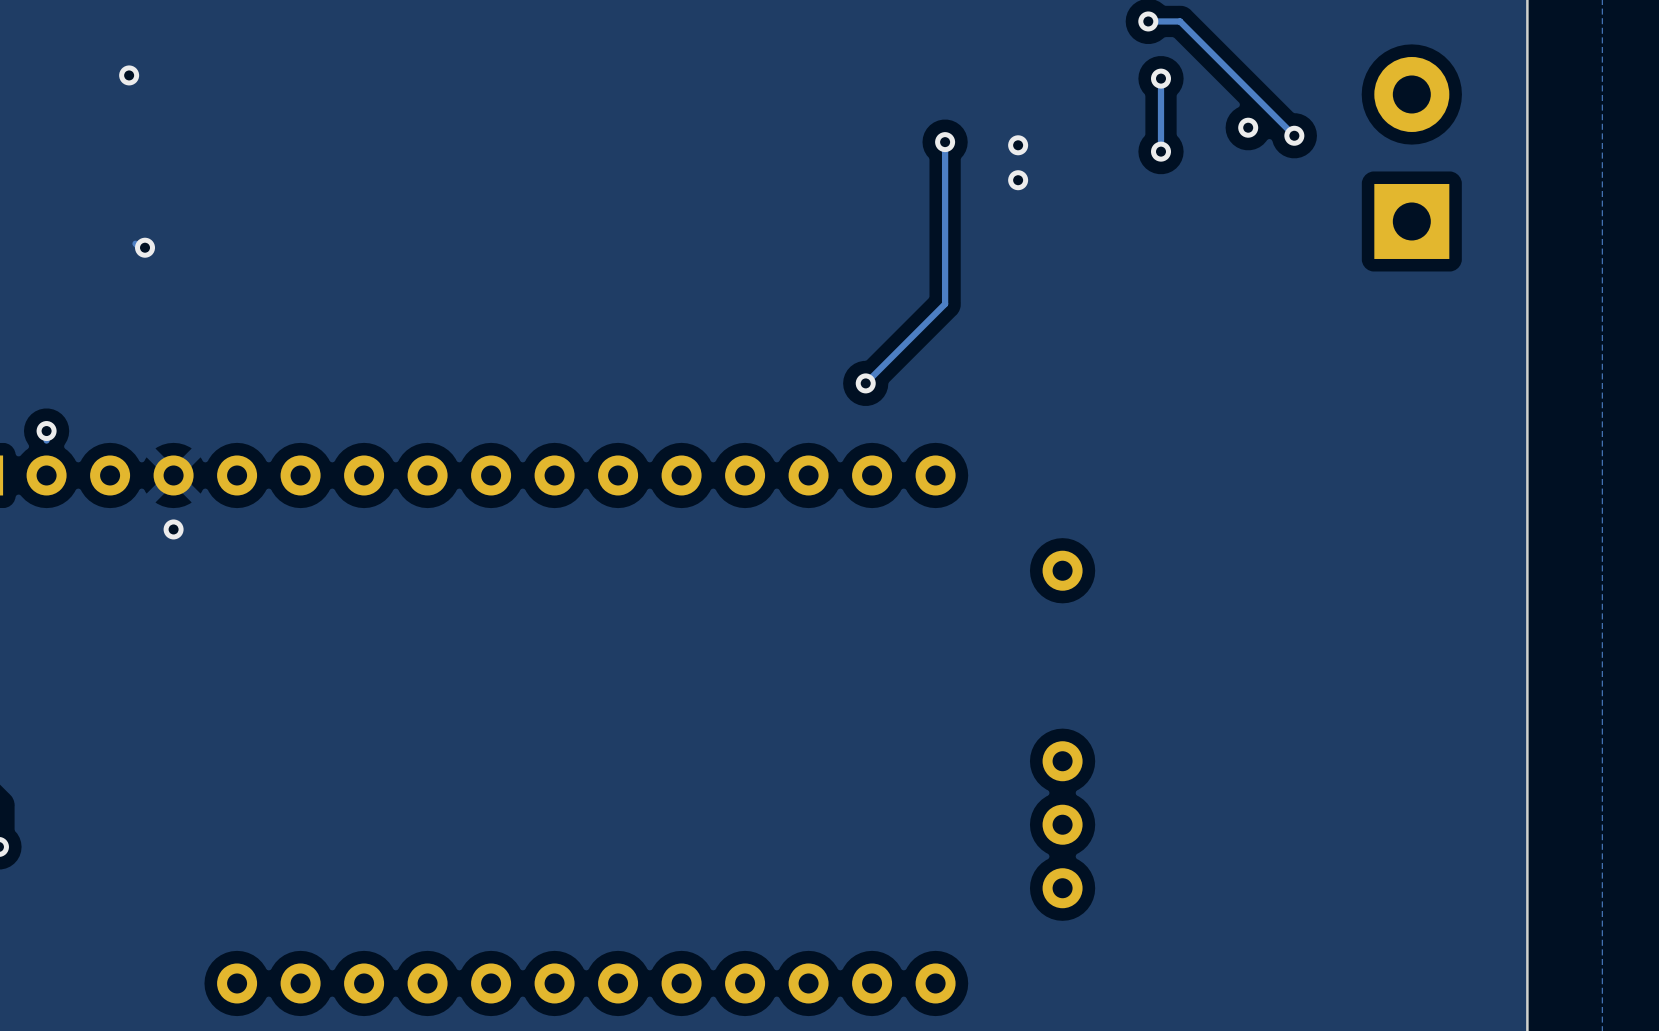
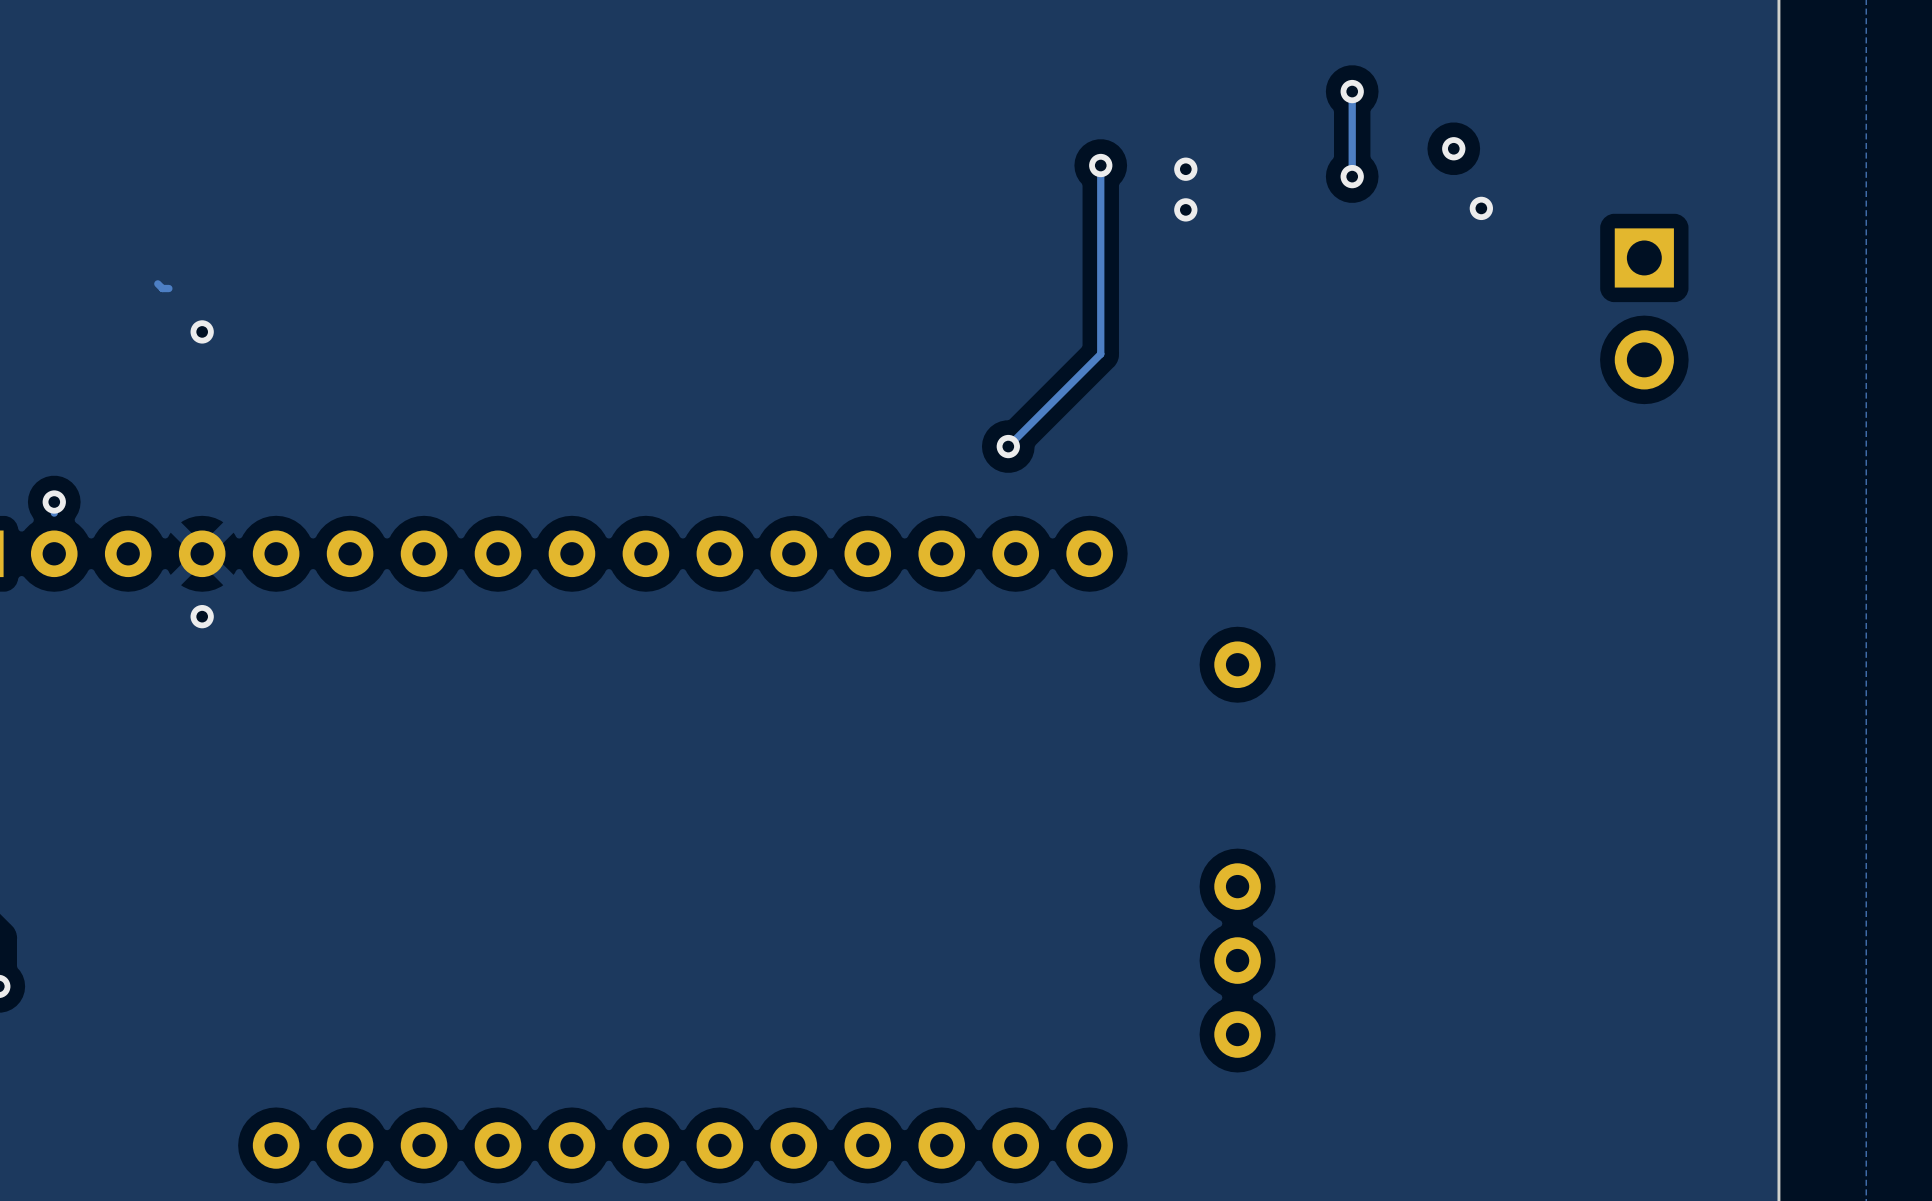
track: (1148, 21) (1180, 21) (1294, 135) -> none
via: (1148, 21) -> none
via: (129, 75) -> none
via position: (1294, 135) -> (1481, 208)
part: (1411, 157) -> none
via position: (145, 247) -> (202, 331)
part: none -> (1644, 308)

